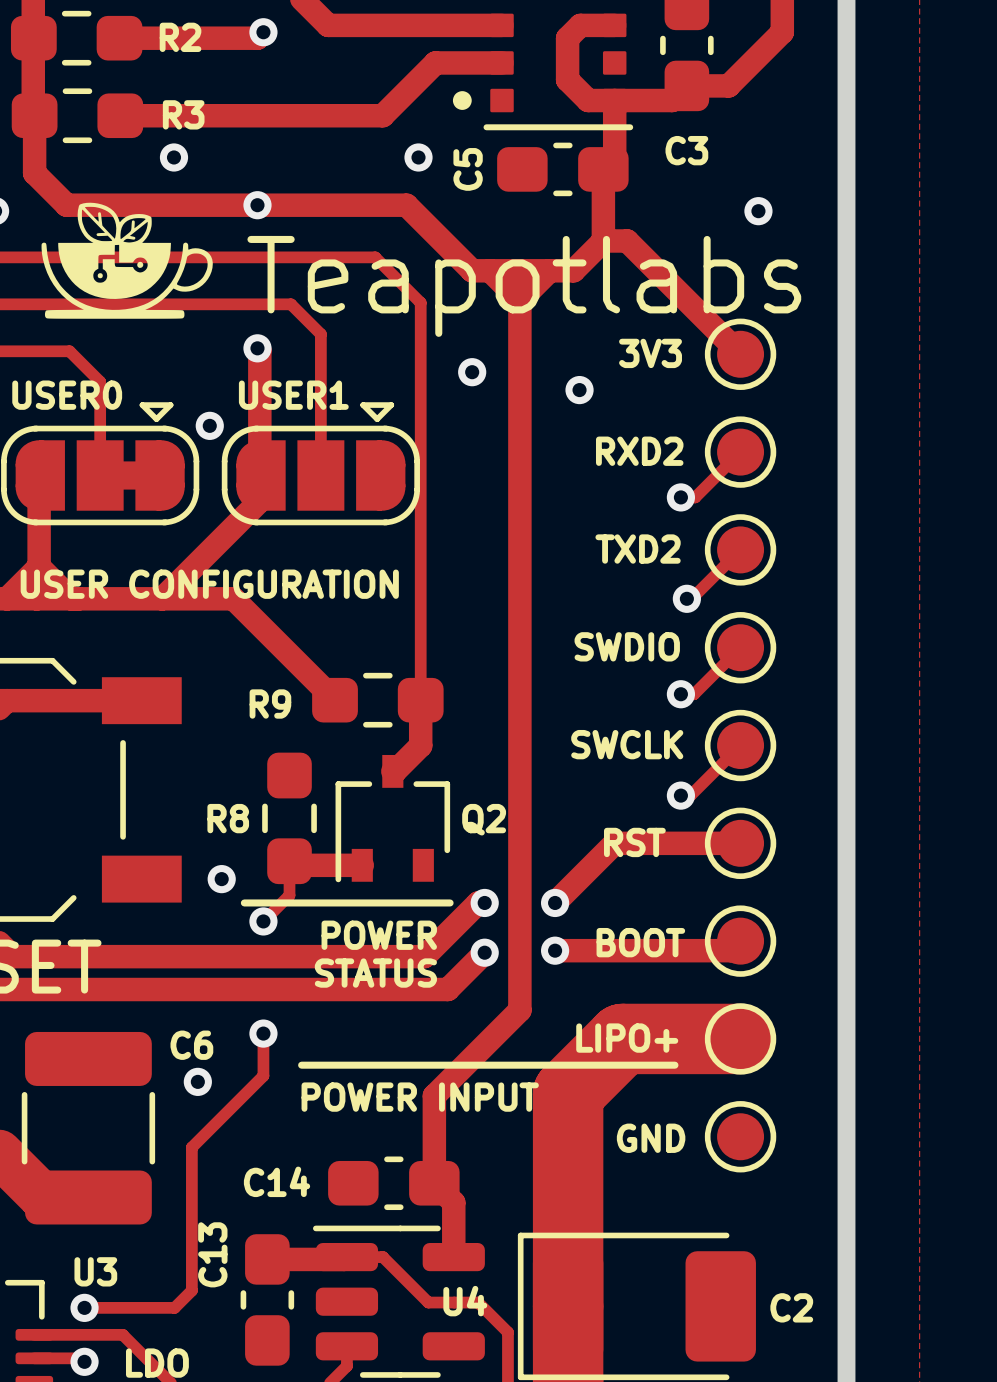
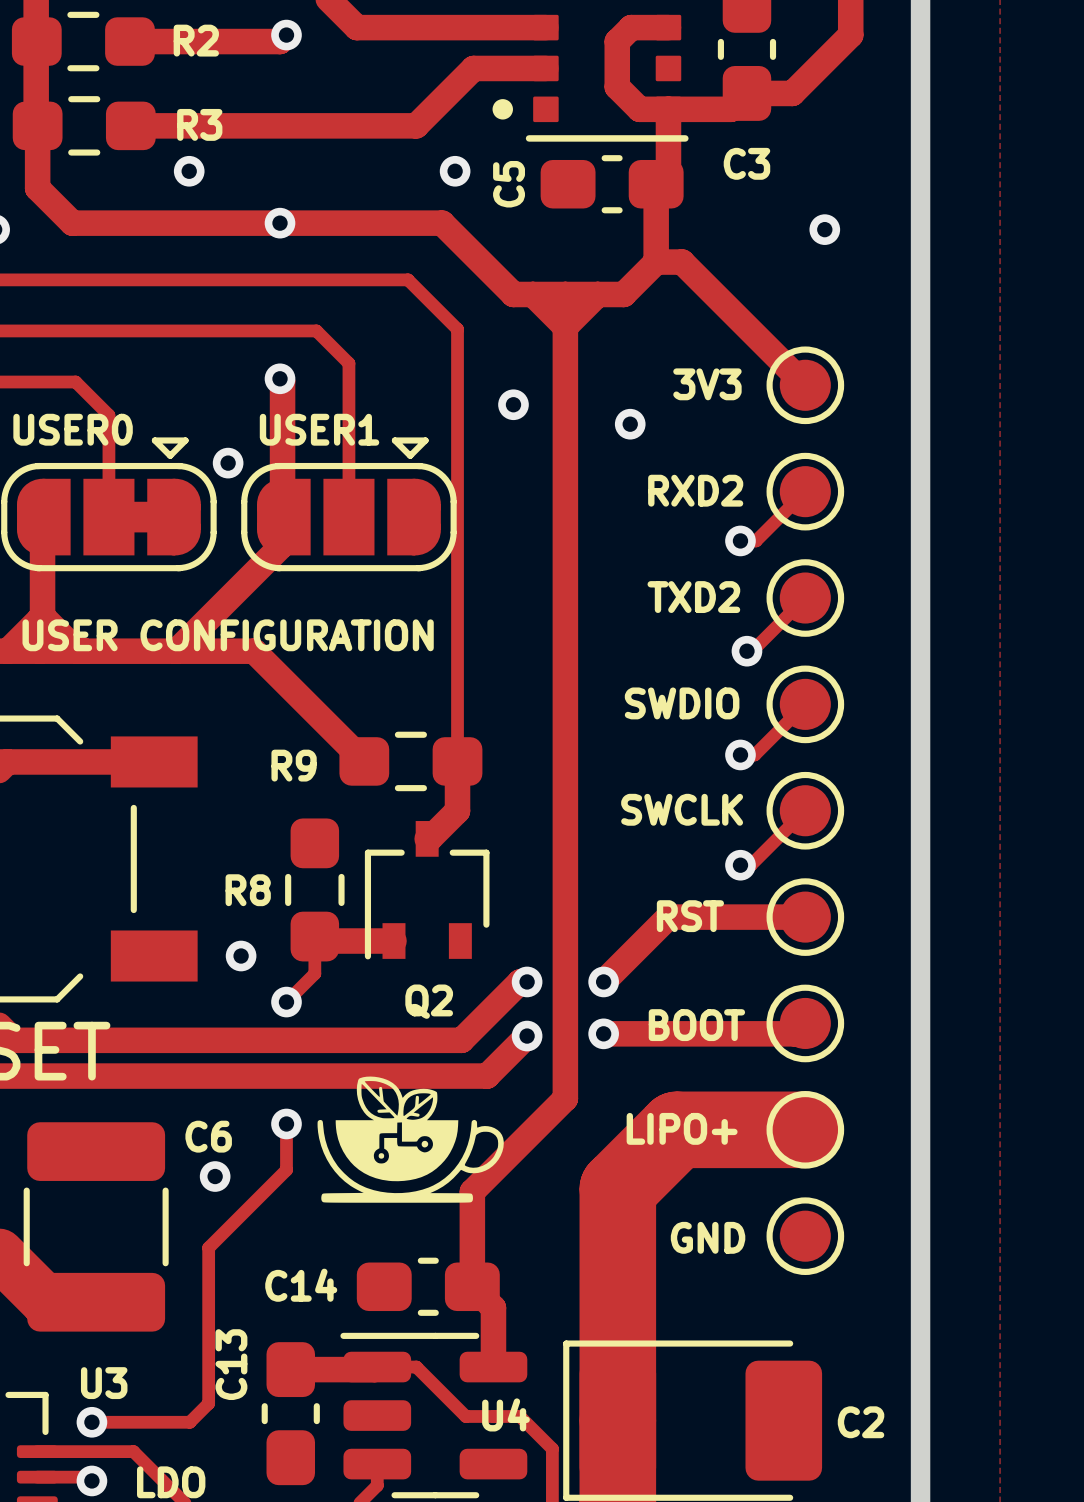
drawing position: (127, 260) -> (410, 1139)
text: Teapotlabs (524, 286) -> none
Q2 name position: Q2 (484, 819) -> Q2 (429, 1001)
line: (244, 902) (450, 902) -> none
text: POWER (379, 935) -> none
text: STATUS (375, 973) -> none
line: (301, 1065) (674, 1065) -> none
text: POWER INPUT (420, 1097) -> none

